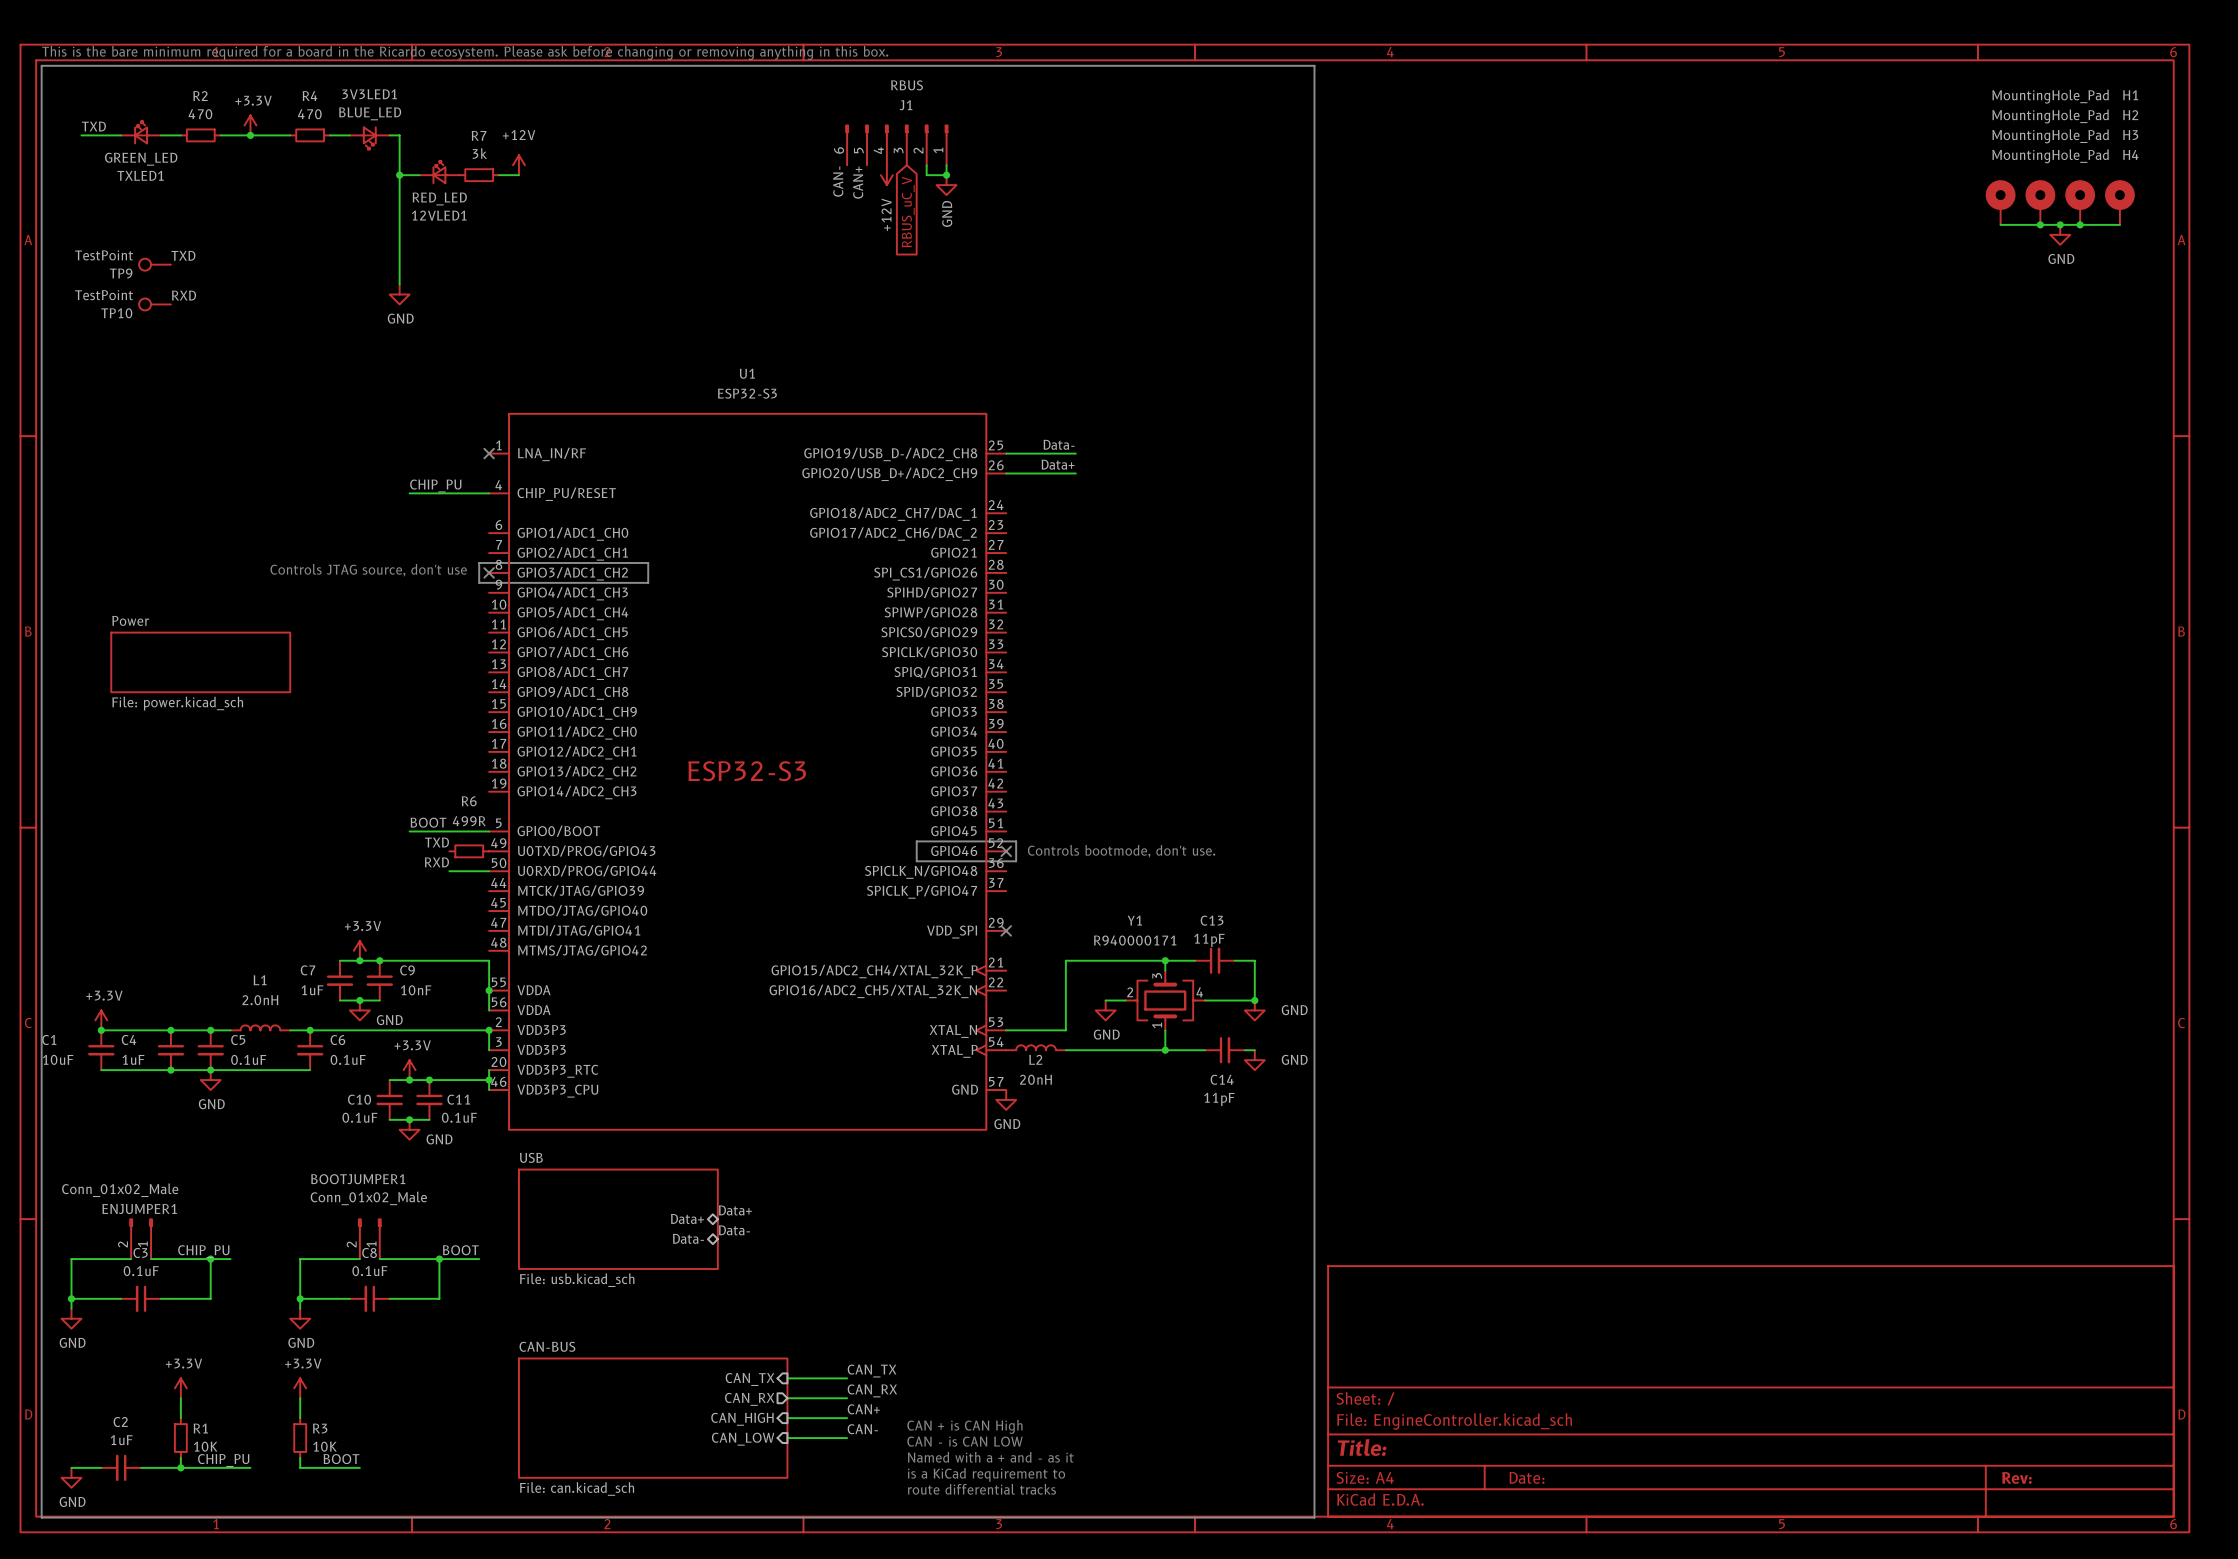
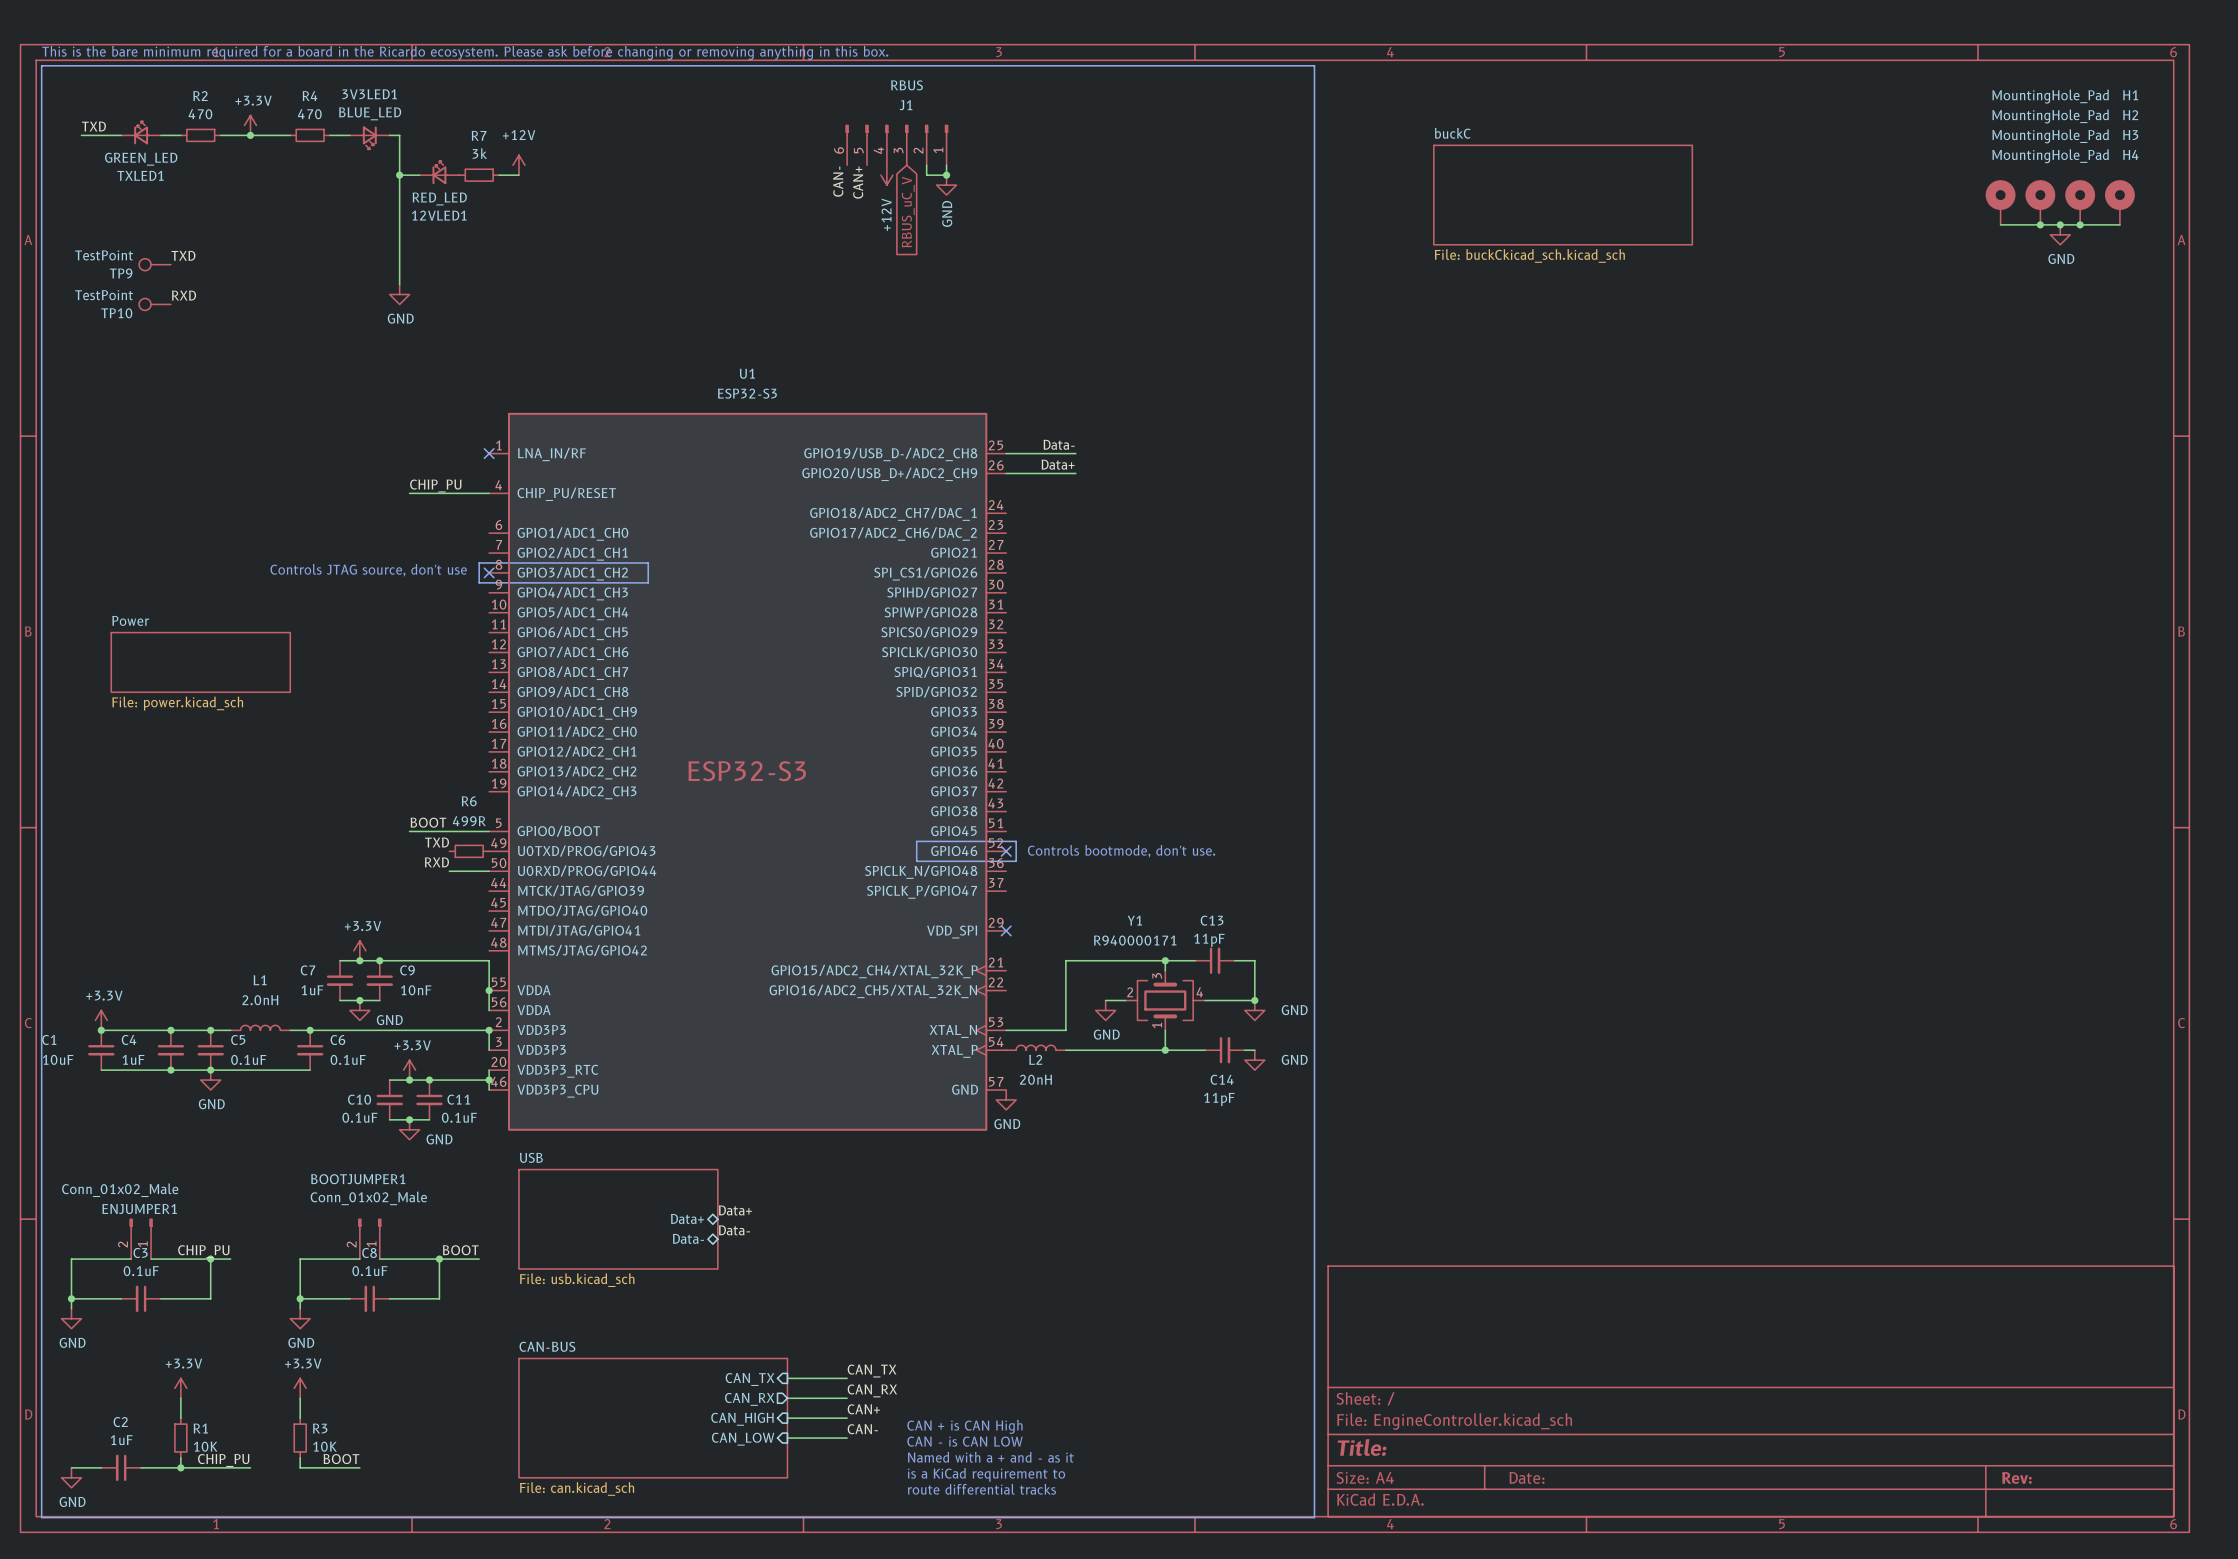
sheet buckC: none -> File: buckCkicad_sch.kicad_sch (1563, 195)

